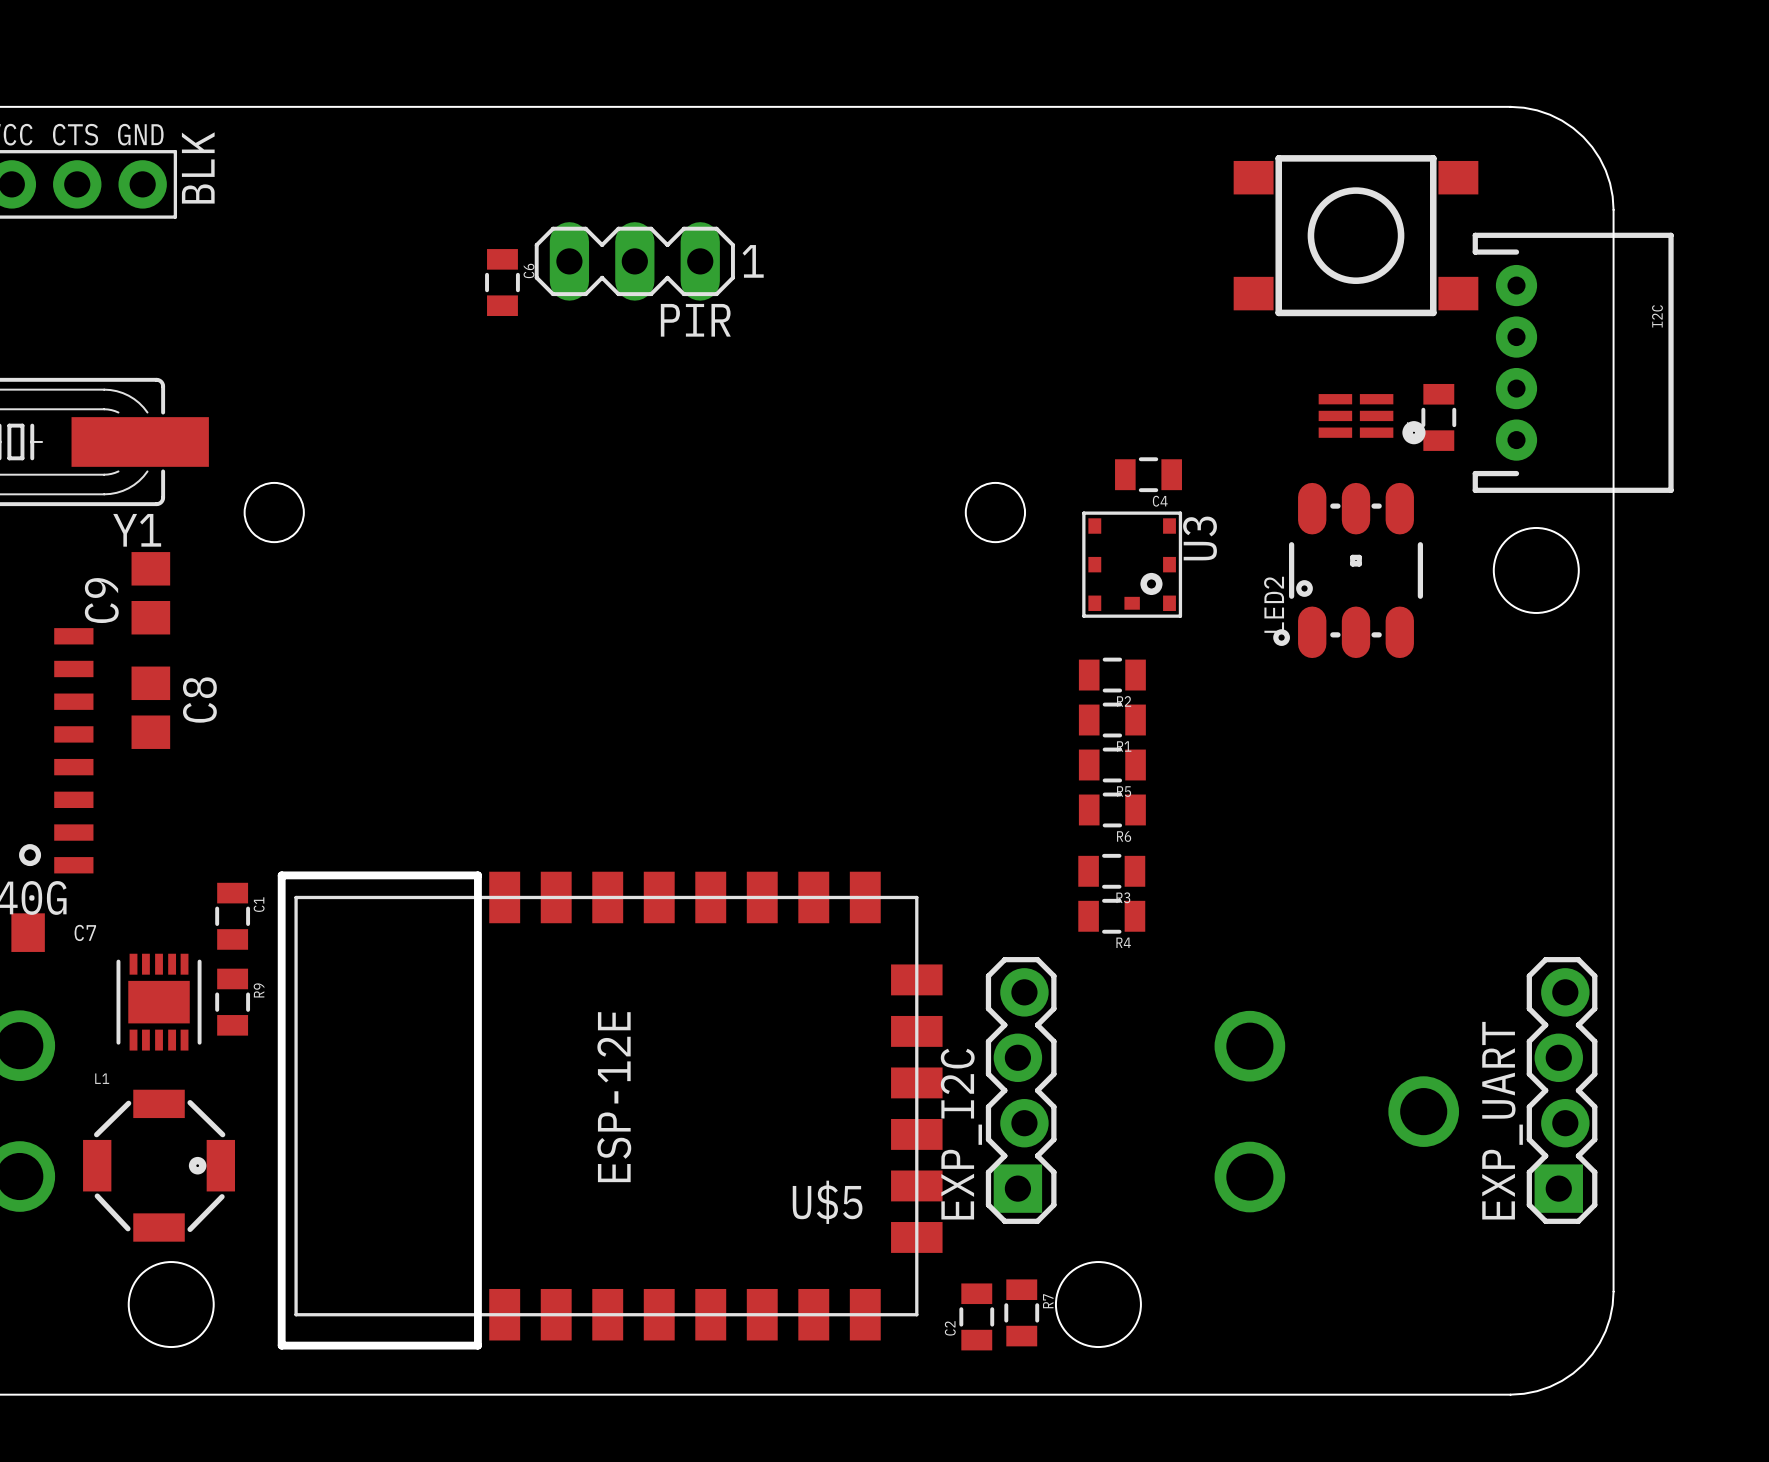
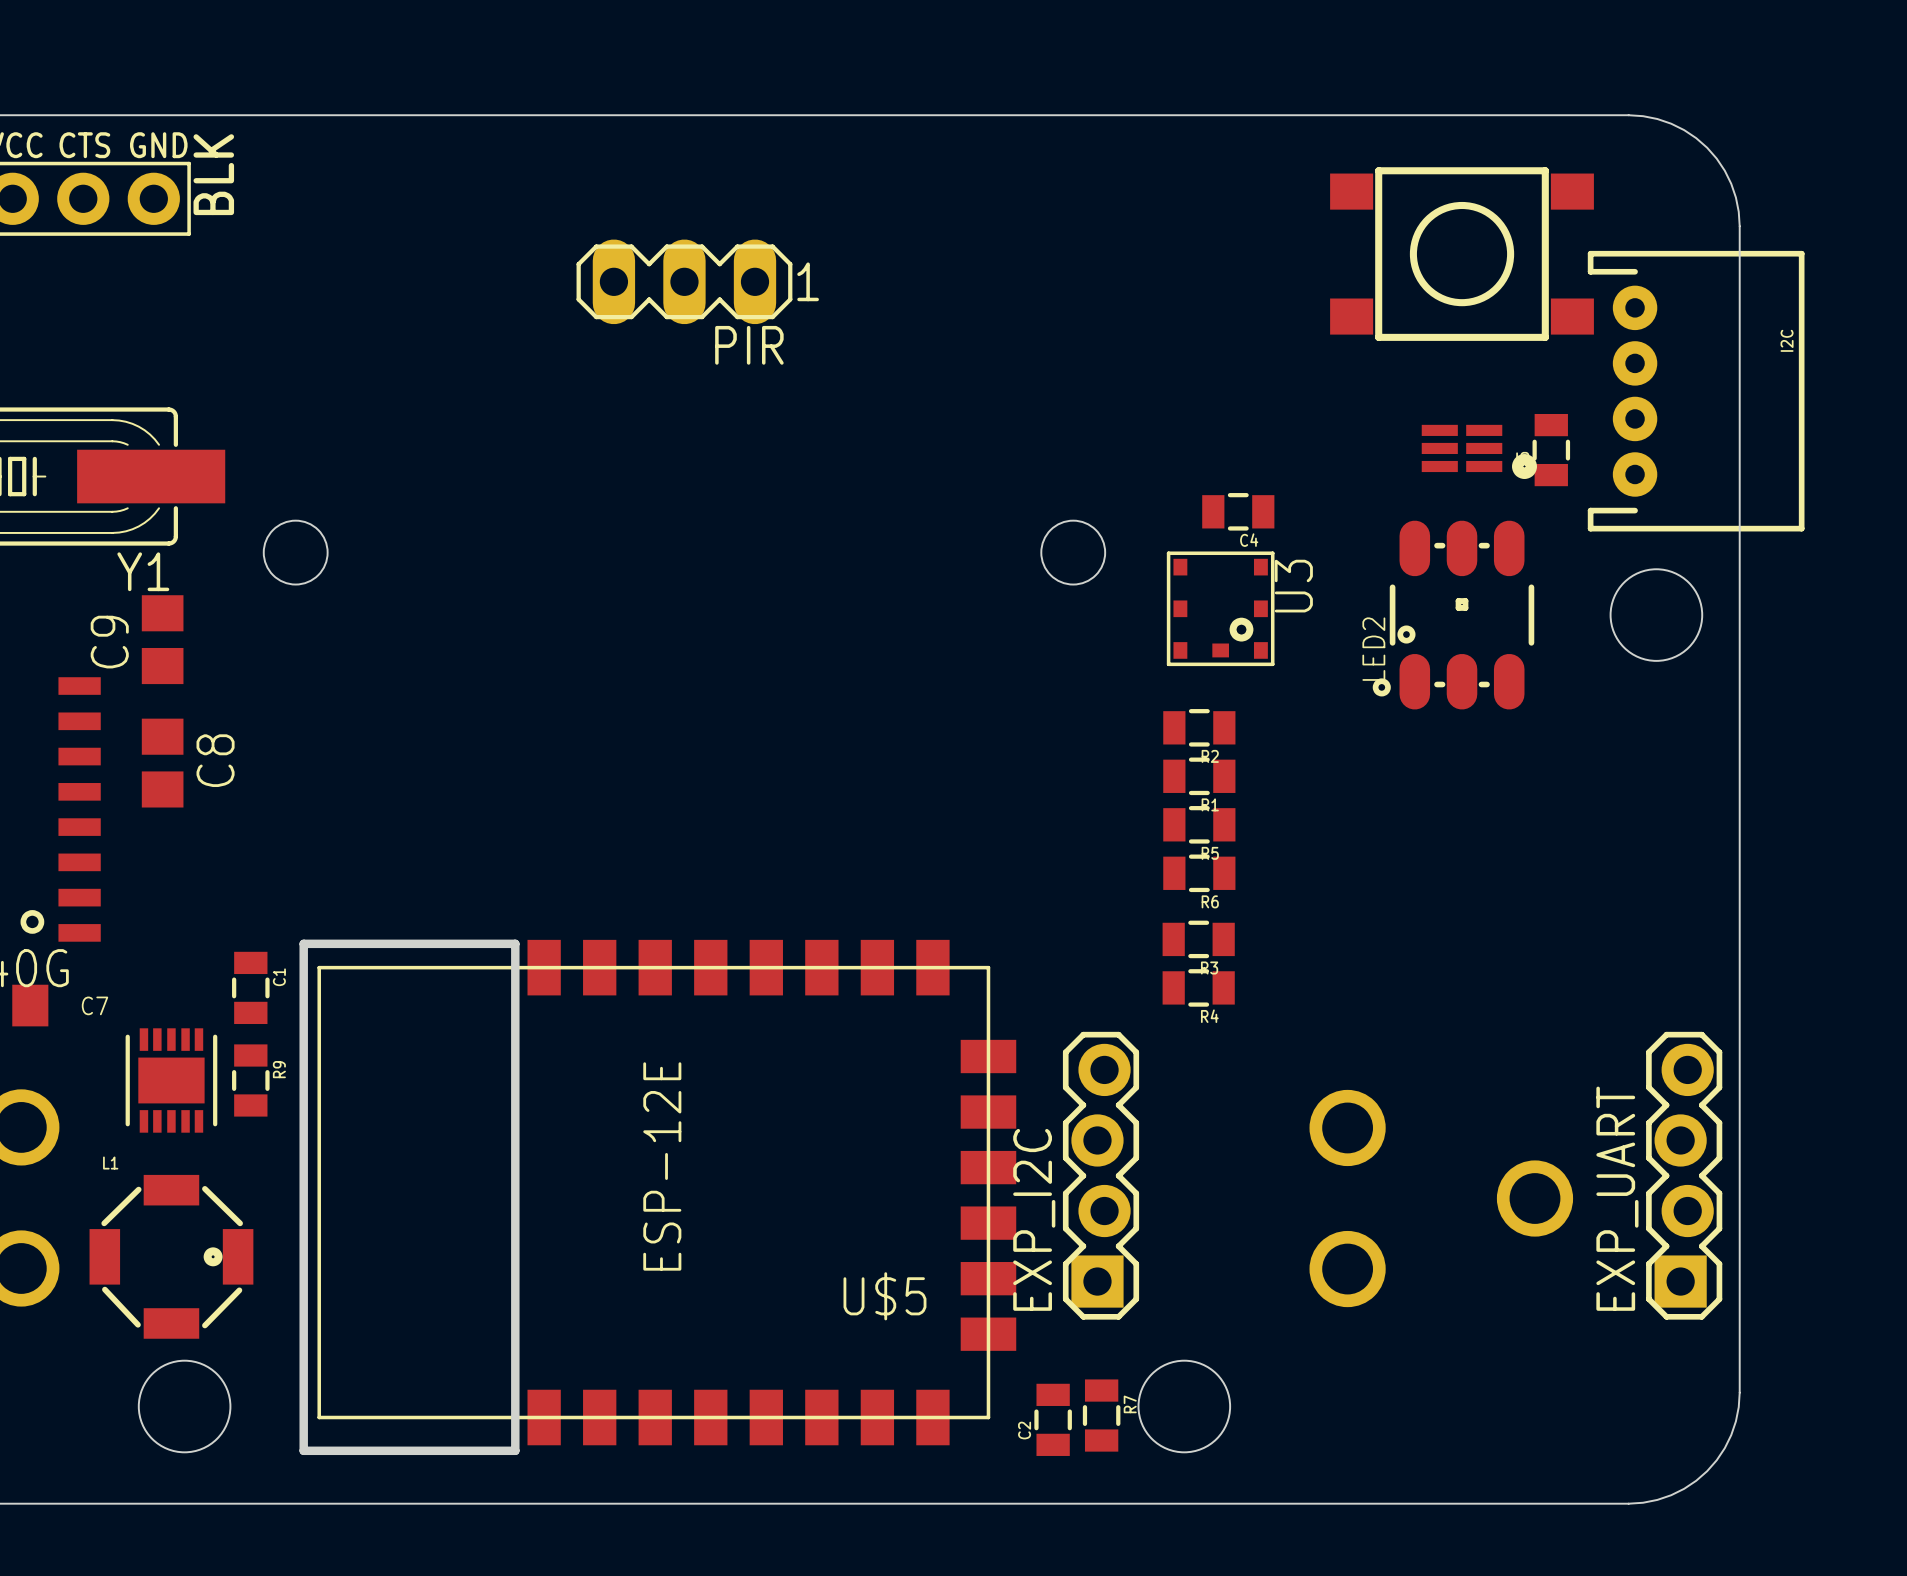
C6: (502, 282) -> none

